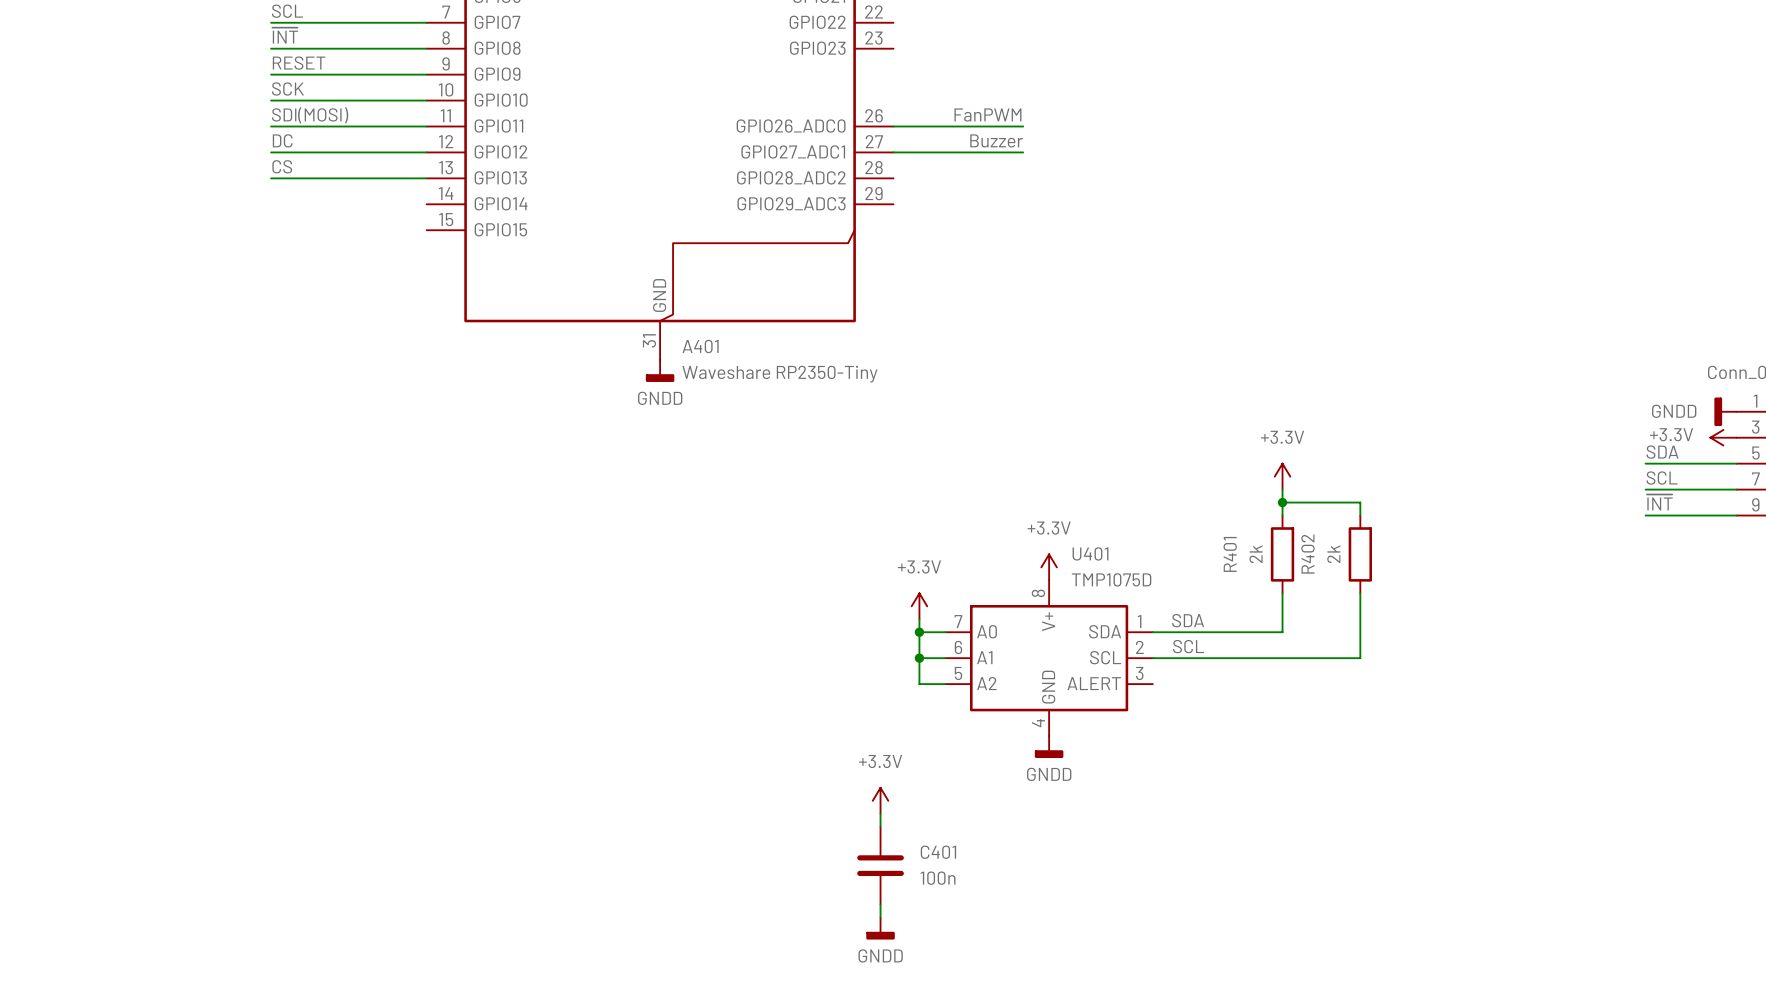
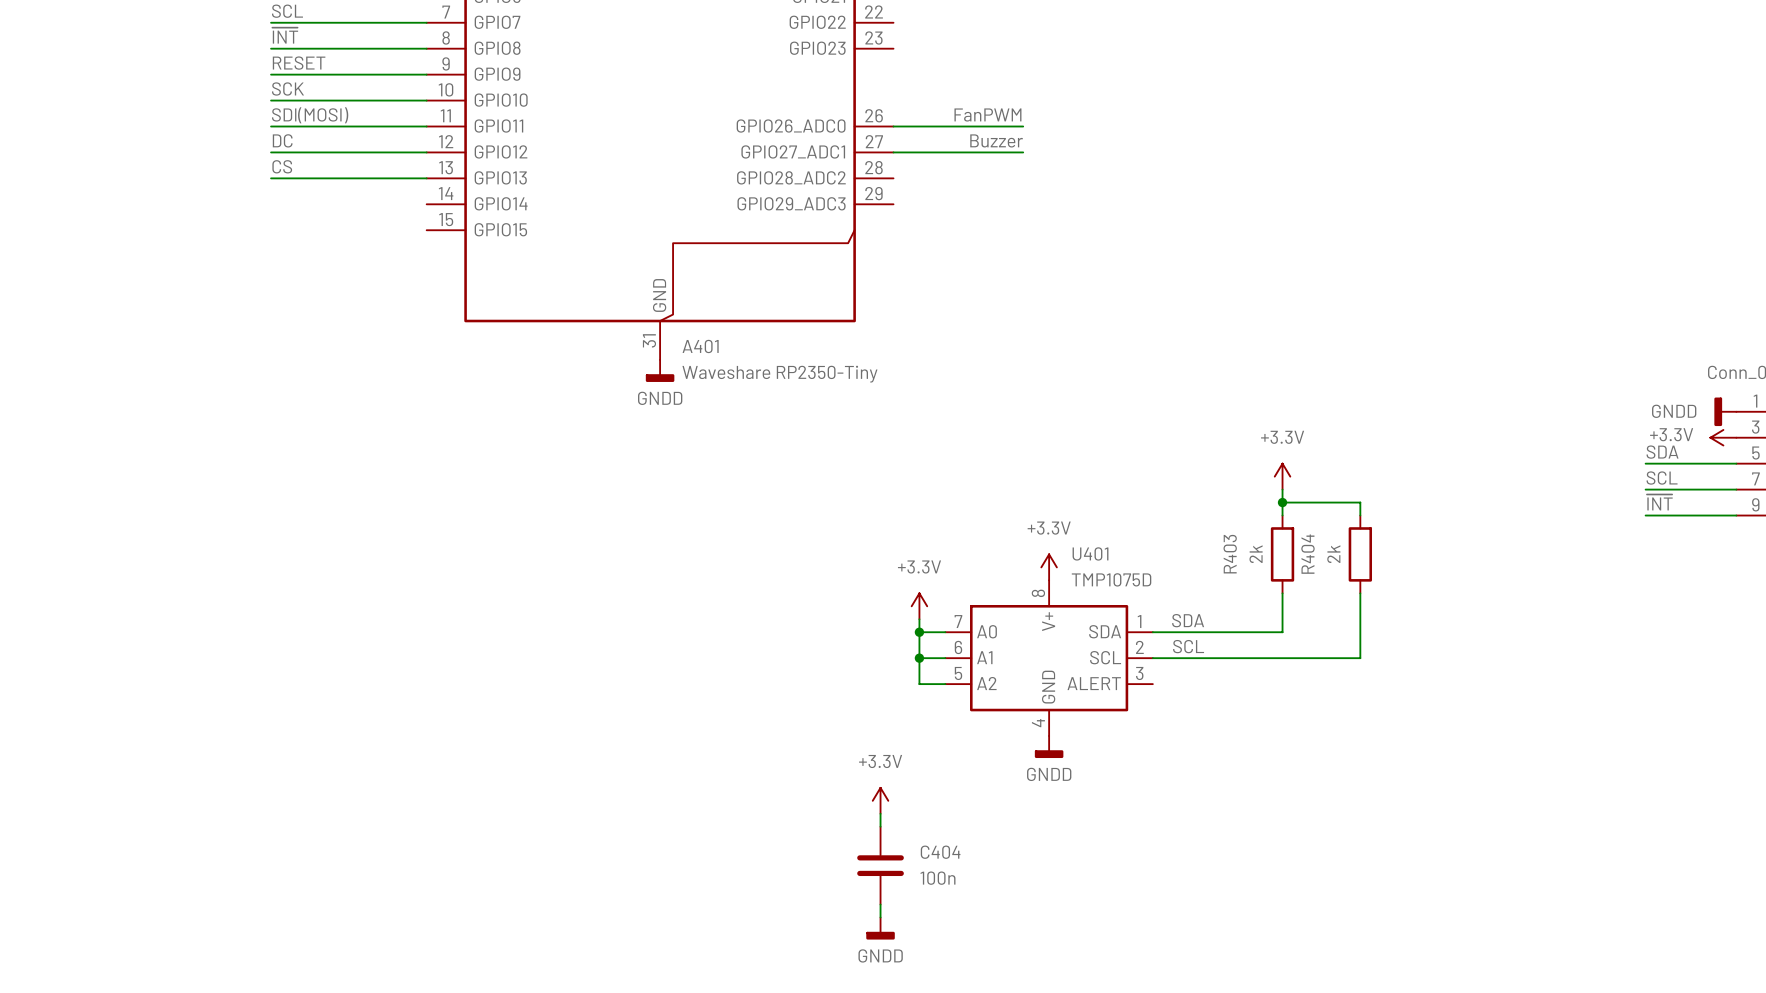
R401 name: R401 (1230, 554) -> R403 (1230, 554)
R402 name: R402 (1307, 554) -> R404 (1307, 554)
C401 name: C401 (938, 852) -> C404 (940, 852)

